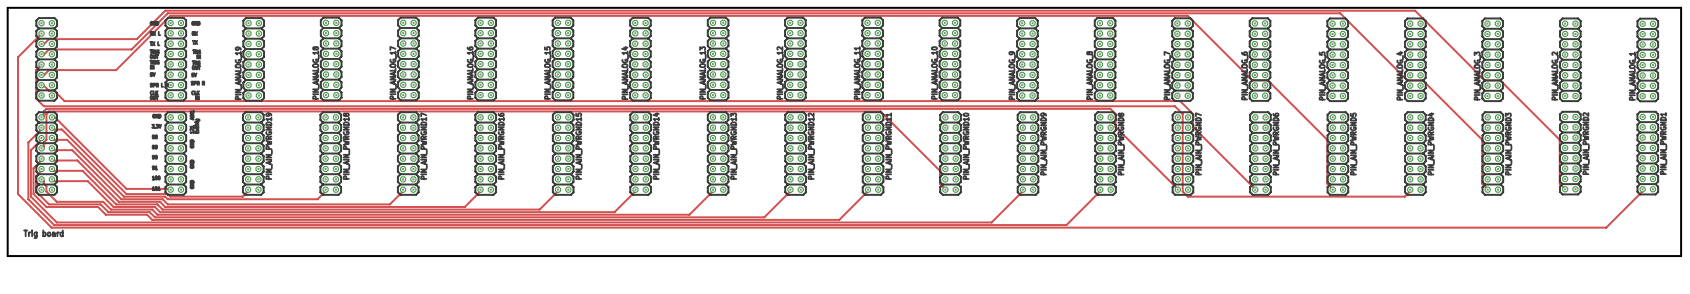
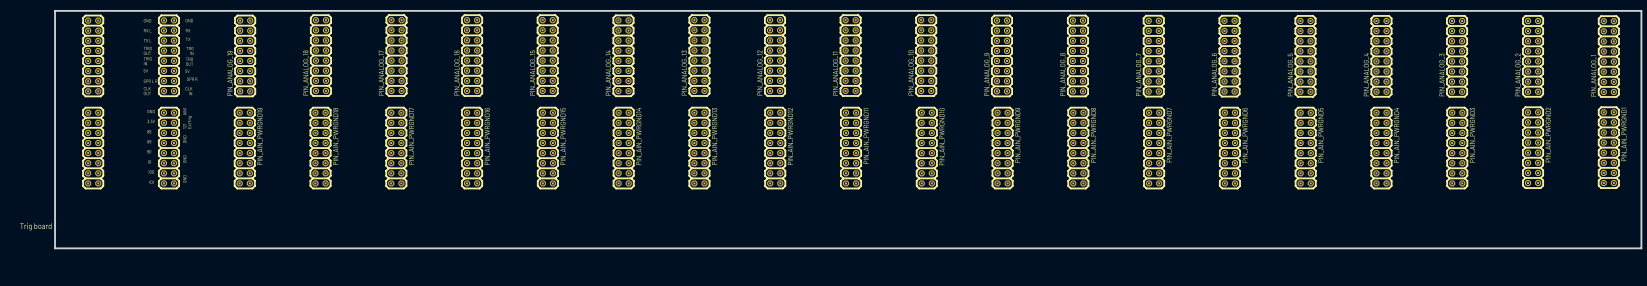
board edge: (1681, 13) (1681, 7) (7, 7) (7, 256) (59, 256) -> (1641, 10) (55, 10) (55, 248)
track: (41, 33) (18, 57) (18, 194) (51, 227) (1606, 227) (1642, 189) -> none
track: (41, 43) (43, 44) (49, 39) (136, 39) (165, 10) (1415, 10) (1484, 80) (1500, 80) (1559, 139) (1559, 183) (1565, 189) -> none
track: (41, 54) (43, 54) (49, 49) (131, 49) (167, 13) (1340, 13) (1407, 80) (1422, 80) (1482, 139) (1482, 183) (1487, 189) -> none
part position: (46, 59) -> (93, 55)
track: (41, 64) (36, 70) (36, 98) (43, 106) (1174, 106) (1182, 114) (1182, 191) (1187, 196) (1404, 196) (1410, 189) -> none
track: (41, 74) (43, 75) (49, 70) (116, 70) (170, 15) (1187, 15) (1252, 80) (1267, 80) (1327, 139) (1327, 183) (1332, 189) -> none
track: (41, 85) (49, 90) (54, 90) (64, 101) (1180, 101) (1193, 114) (1193, 126) (1255, 189) -> none
track: (41, 117) (43, 116) (43, 111) (46, 108) (1110, 108) (1115, 114) (1115, 126) (1177, 189) -> none
track: (51, 117) (54, 116) (126, 188) (170, 189) -> none
track: (41, 127) (28, 142) (28, 199) (54, 225) (1066, 225) (1100, 189) -> none
track: (51, 127) (61, 129) (126, 194) (167, 194) (170, 196) (242, 196) (248, 189) -> none
track: (41, 138) (30, 150) (30, 196) (56, 222) (991, 222) (1022, 189) -> none
track: (51, 138) (54, 139) (67, 139) (123, 196) (165, 196) (167, 199) (317, 199) (325, 189) -> none
track: (41, 148) (43, 147) (43, 142) (46, 139) (46, 114) (49, 111) (880, 111) (939, 170) (939, 183) (945, 189) -> none
track: (51, 148) (54, 150) (72, 150) (121, 199) (162, 199) (167, 204) (389, 204) (403, 189) -> none
part position: (46, 153) -> (93, 148)
track: (41, 158) (33, 168) (33, 194) (46, 206) (98, 206) (105, 214) (147, 214) (152, 219) (839, 219) (867, 189) -> none
track: (51, 158) (54, 160) (77, 160) (118, 201) (160, 201) (165, 206) (464, 206) (480, 189) -> none
track: (41, 169) (36, 175) (36, 191) (49, 204) (100, 204) (108, 212) (149, 212) (154, 217) (764, 217) (790, 189) -> none
track: (51, 169) (54, 170) (82, 170) (116, 204) (157, 204) (162, 209) (539, 209) (558, 189) -> none
track: (41, 179) (46, 186) (46, 191) (56, 201) (103, 201) (110, 209) (152, 209) (157, 214) (689, 214) (712, 189) -> none
track: (51, 179) (54, 181) (87, 181) (113, 206) (154, 206) (160, 212) (614, 212) (635, 189) -> none

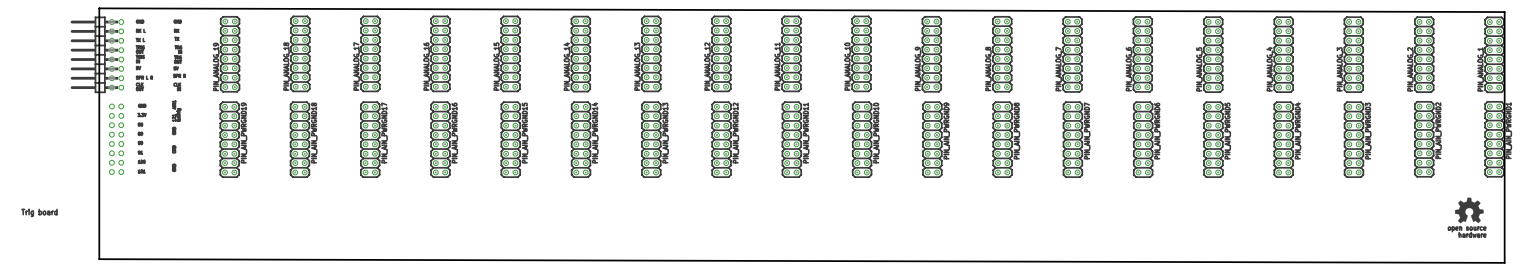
board edge: (55, 10) (55, 248) (1641, 248) (1641, 10) (55, 10) -> (99, 8) (99, 259) (1504, 262) (1504, 12) (99, 8)
part: (93, 55) -> none
part: (168, 55) -> none
part: none -> (97, 54)
part: none -> (116, 139)
part: (93, 148) -> none
part: (168, 148) -> none
drawing: none -> [1455, 197, 1484, 224]

